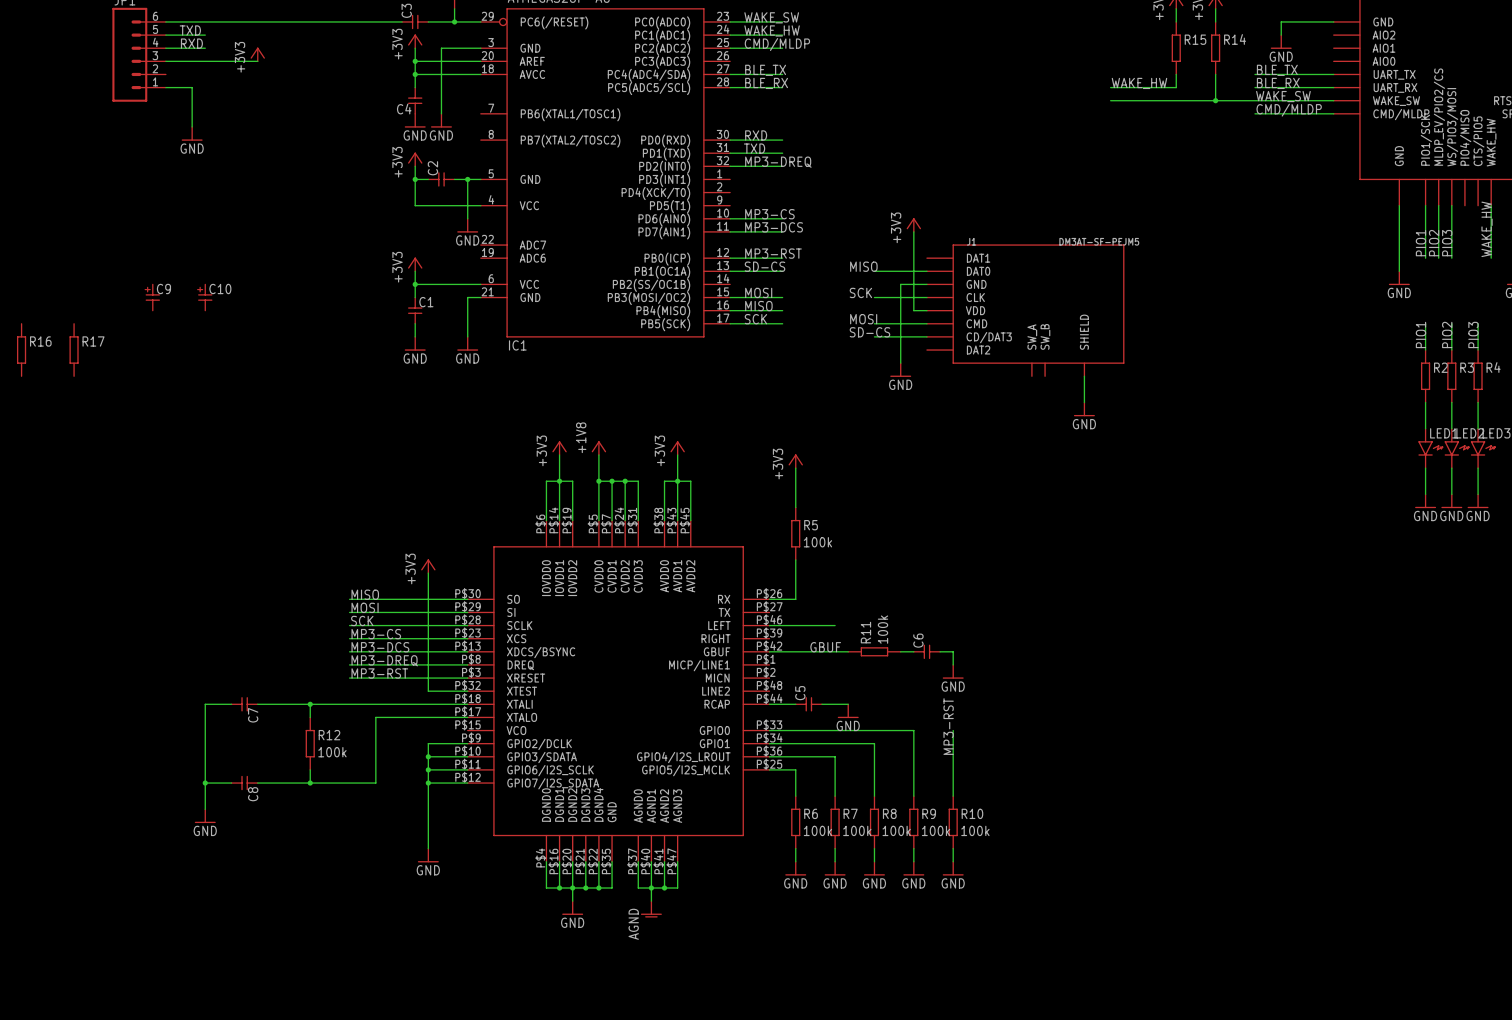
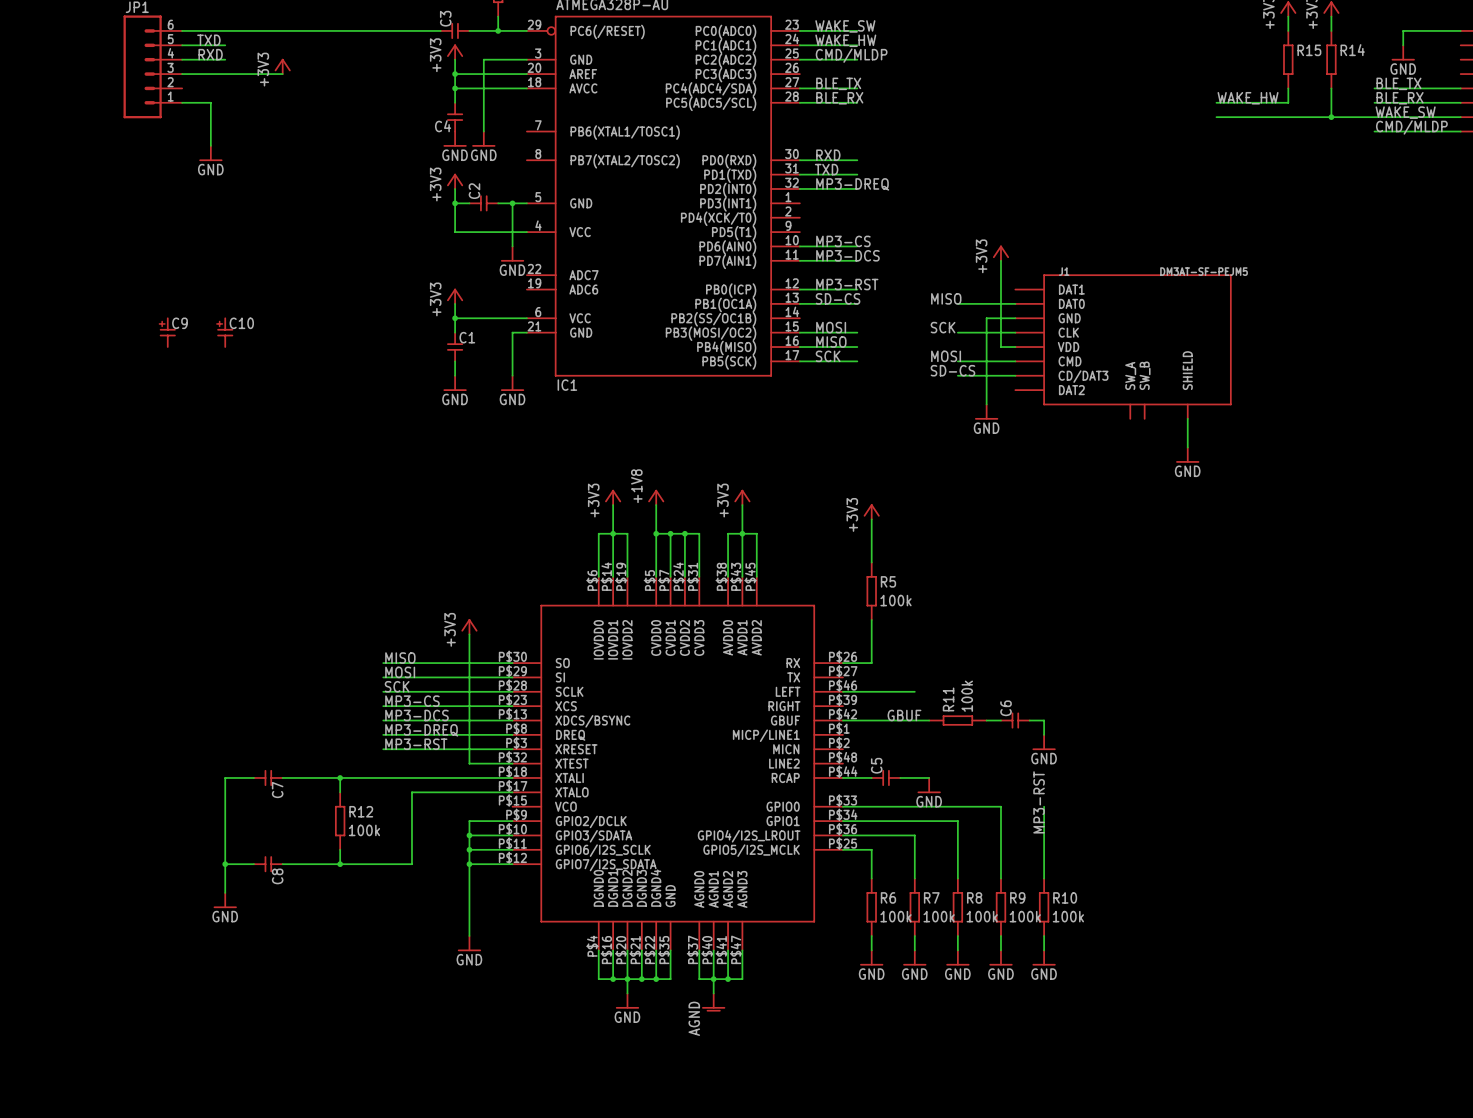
R16: (21, 350) -> none
R17: (74, 350) -> none

